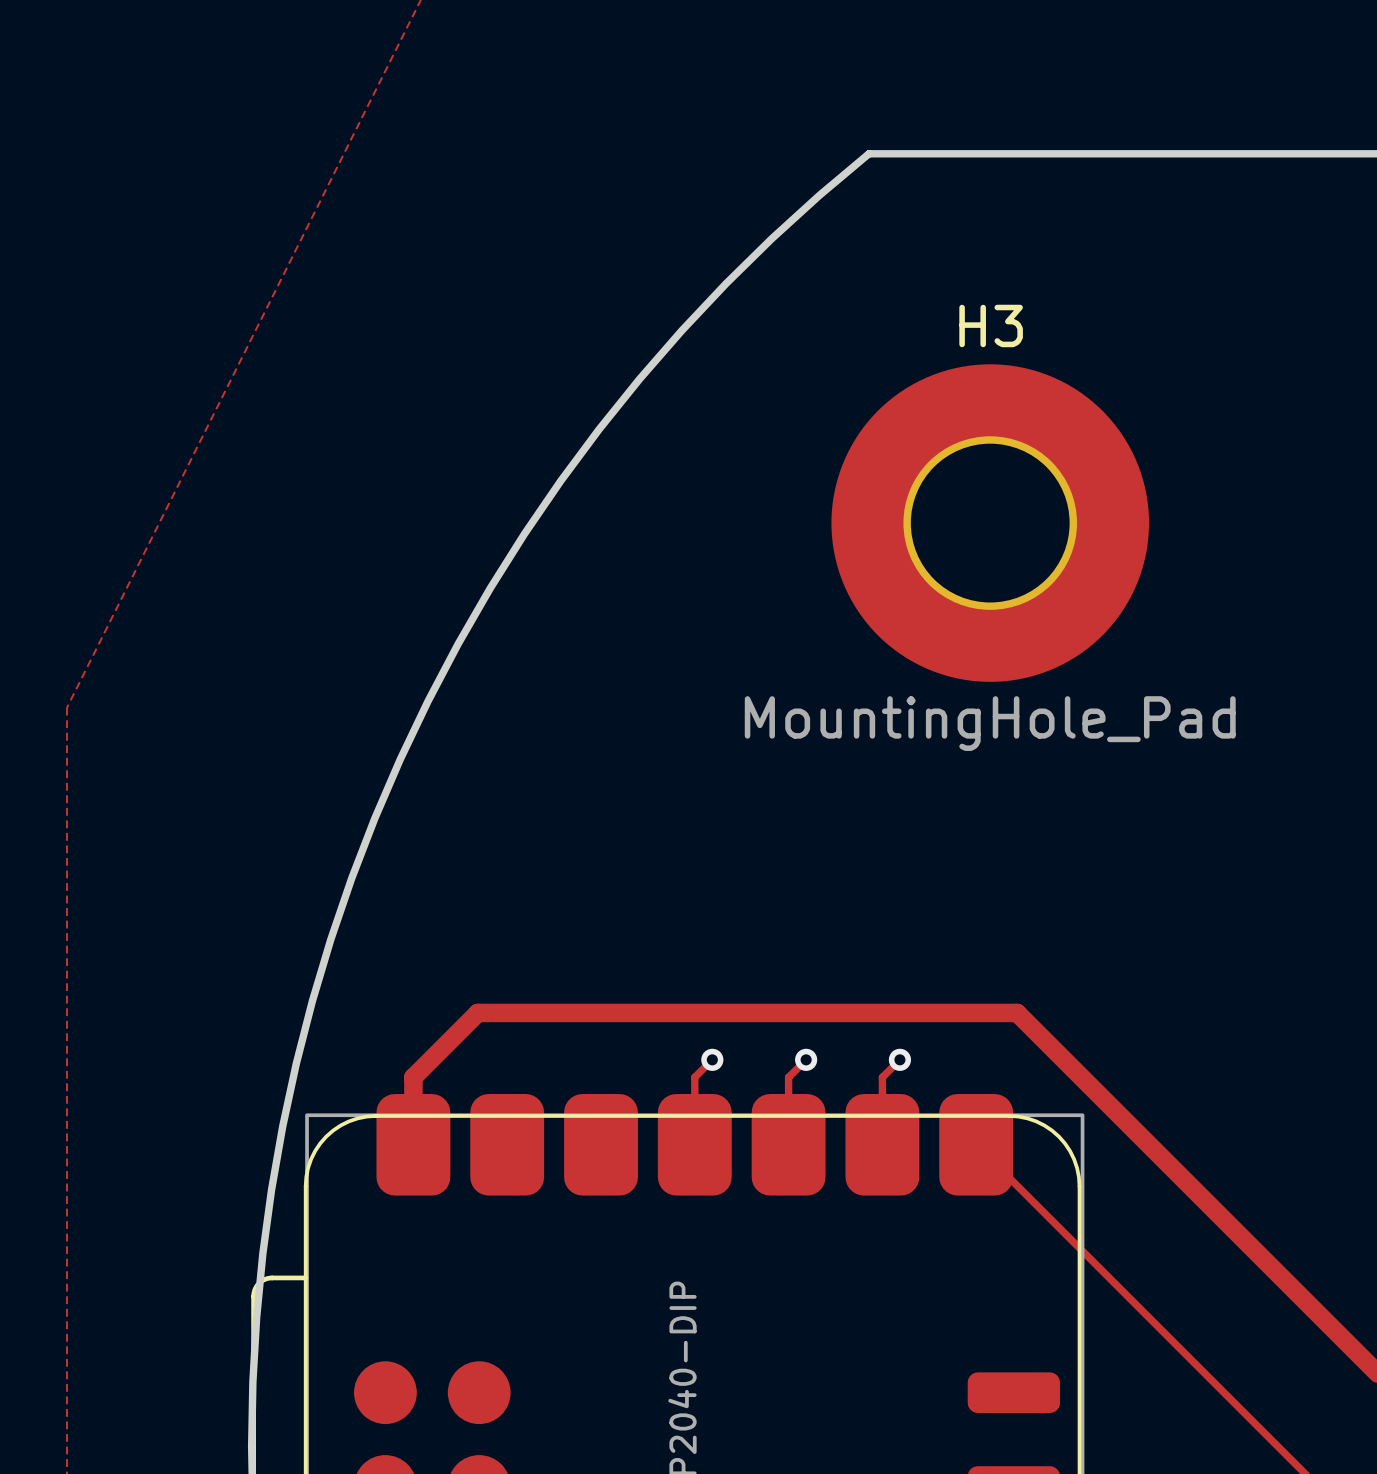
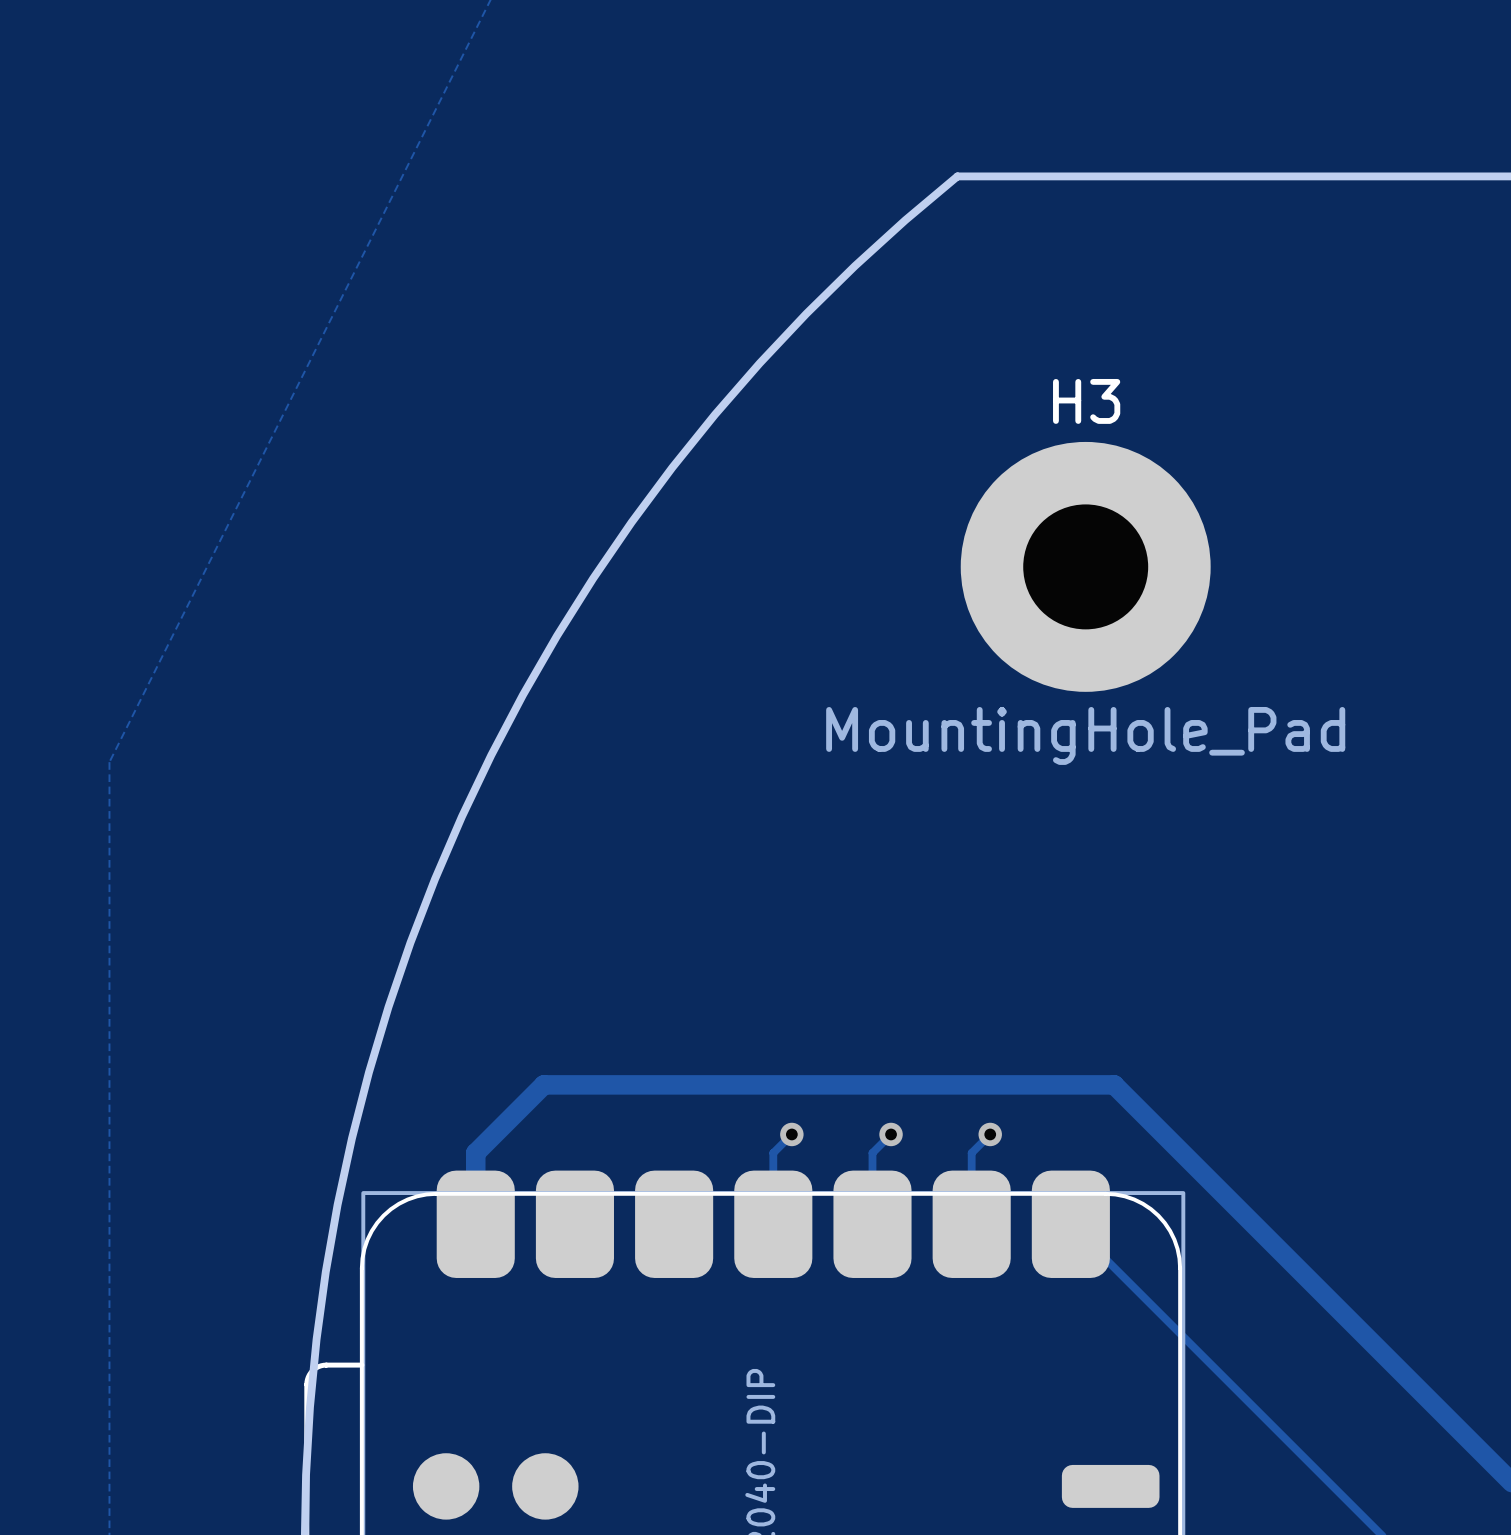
H3 footprint: [831, 364, 1150, 682] -> [960, 441, 1211, 692]

